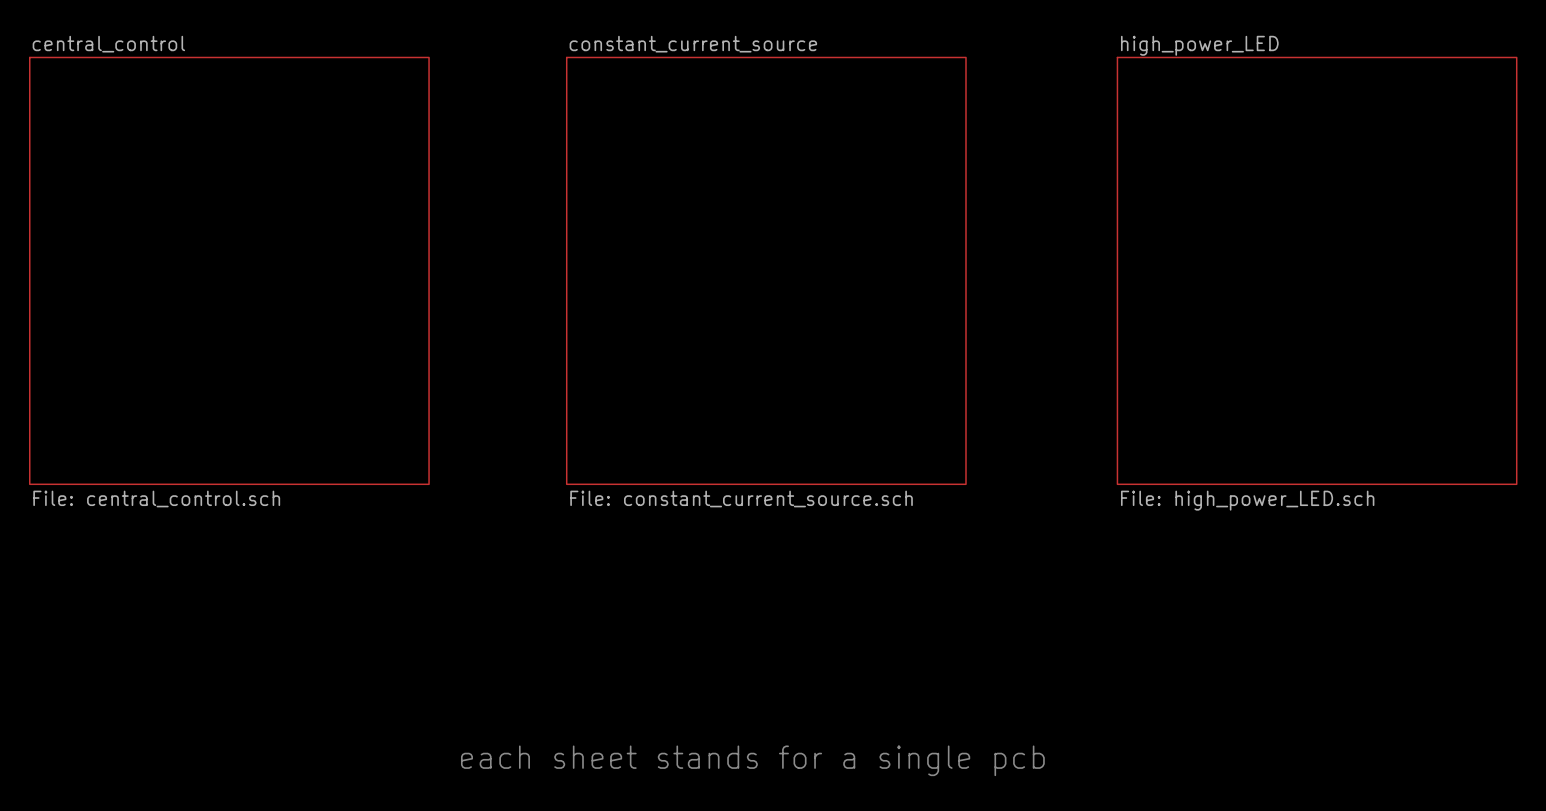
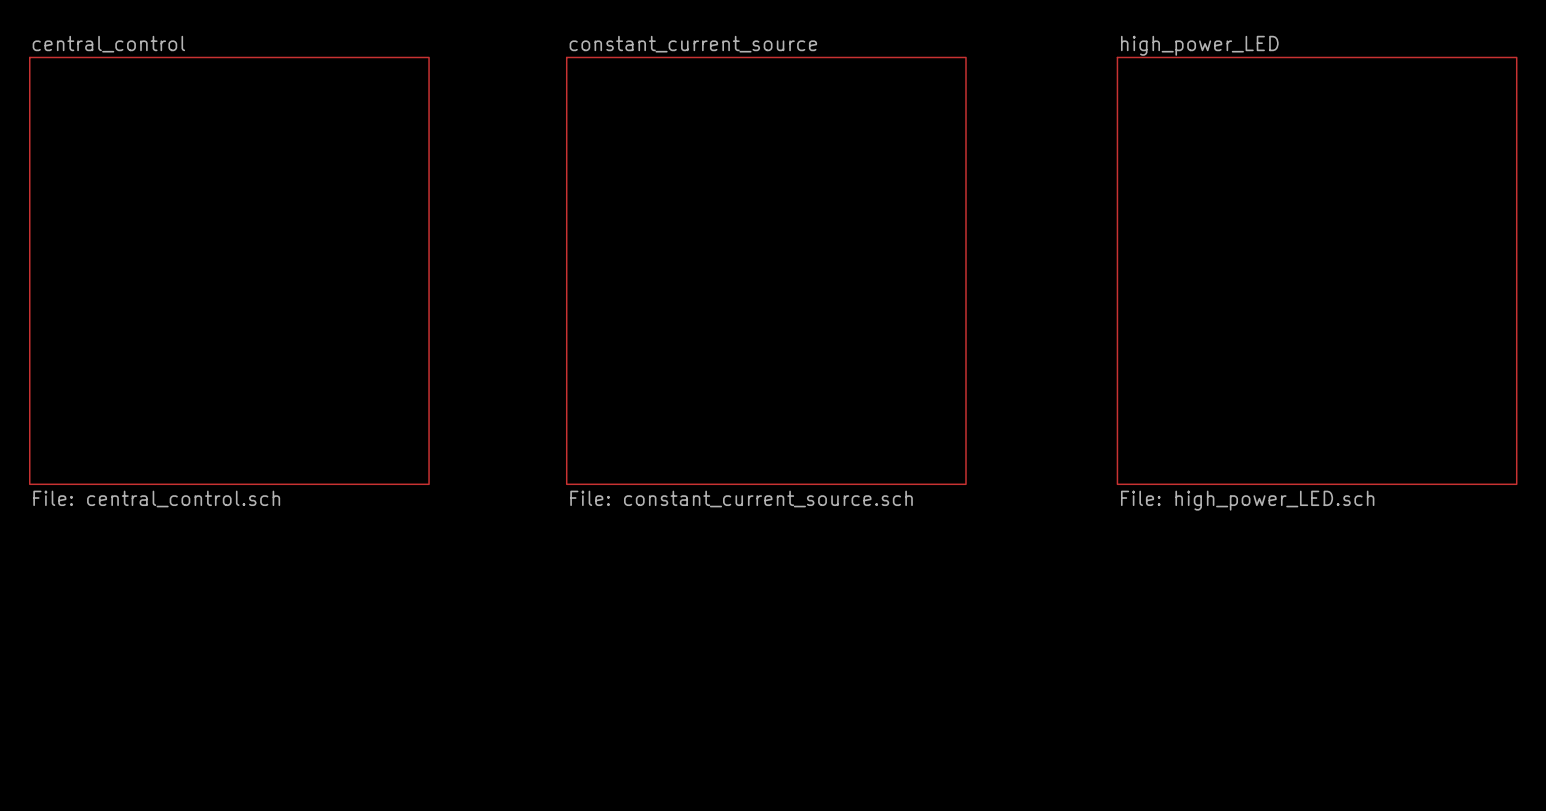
text: each sheet stands for a single pcb (752, 760) -> none

